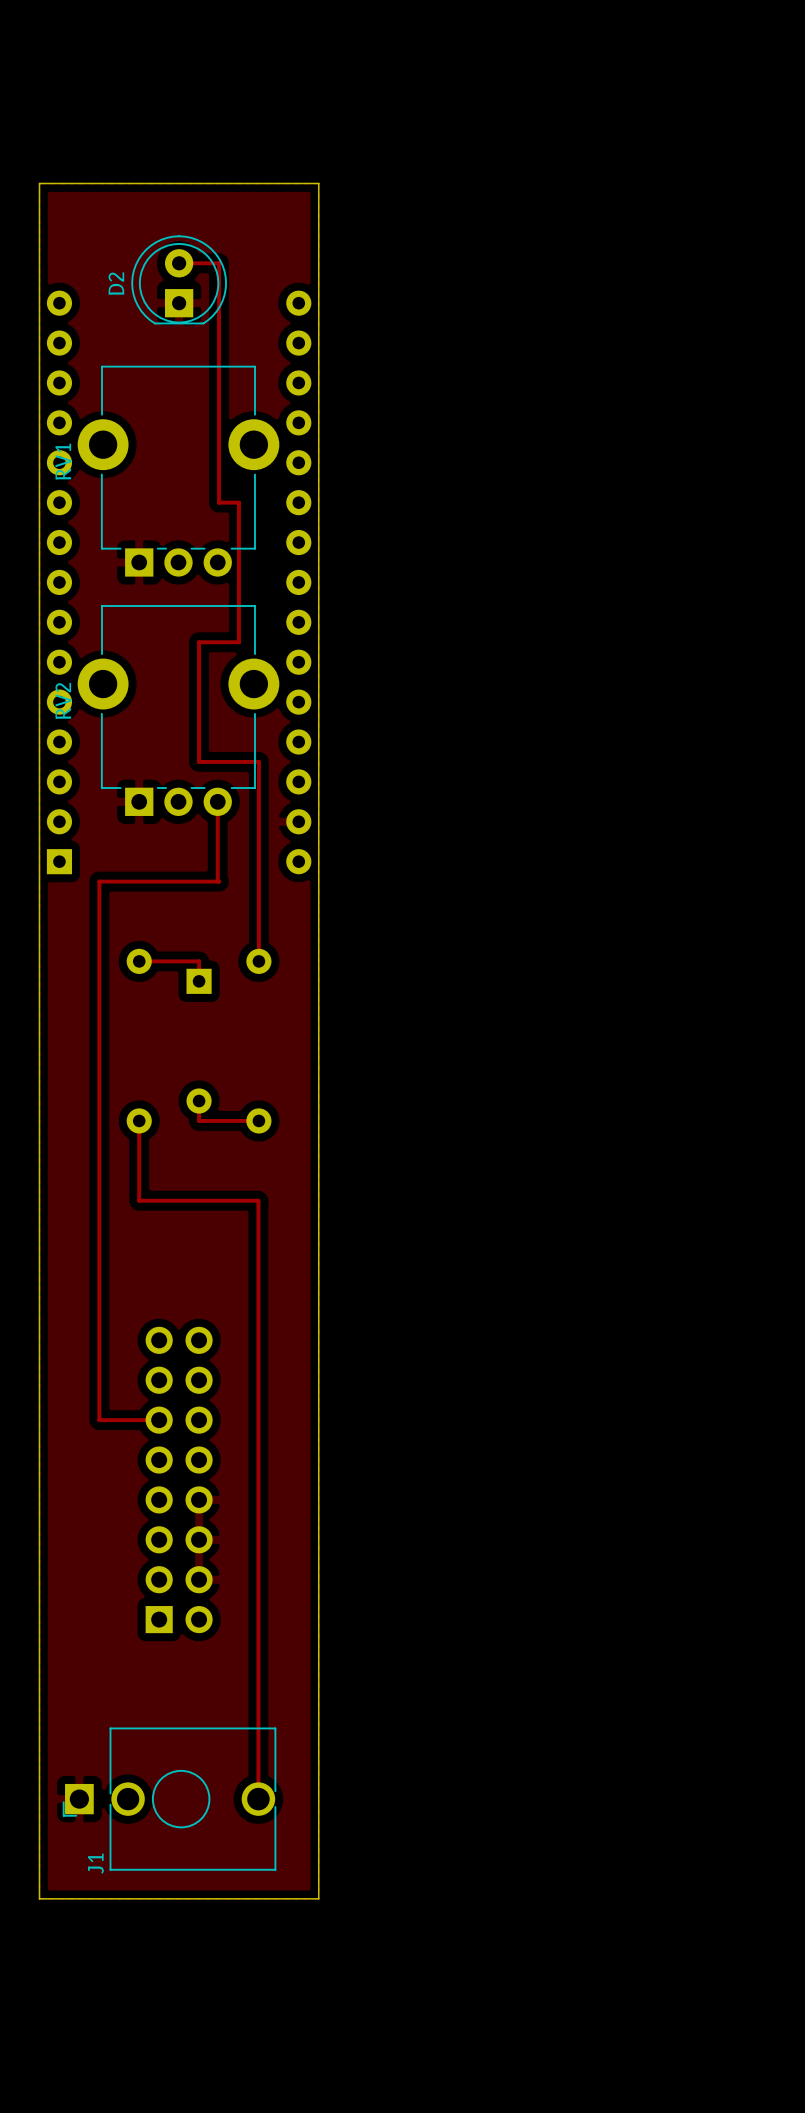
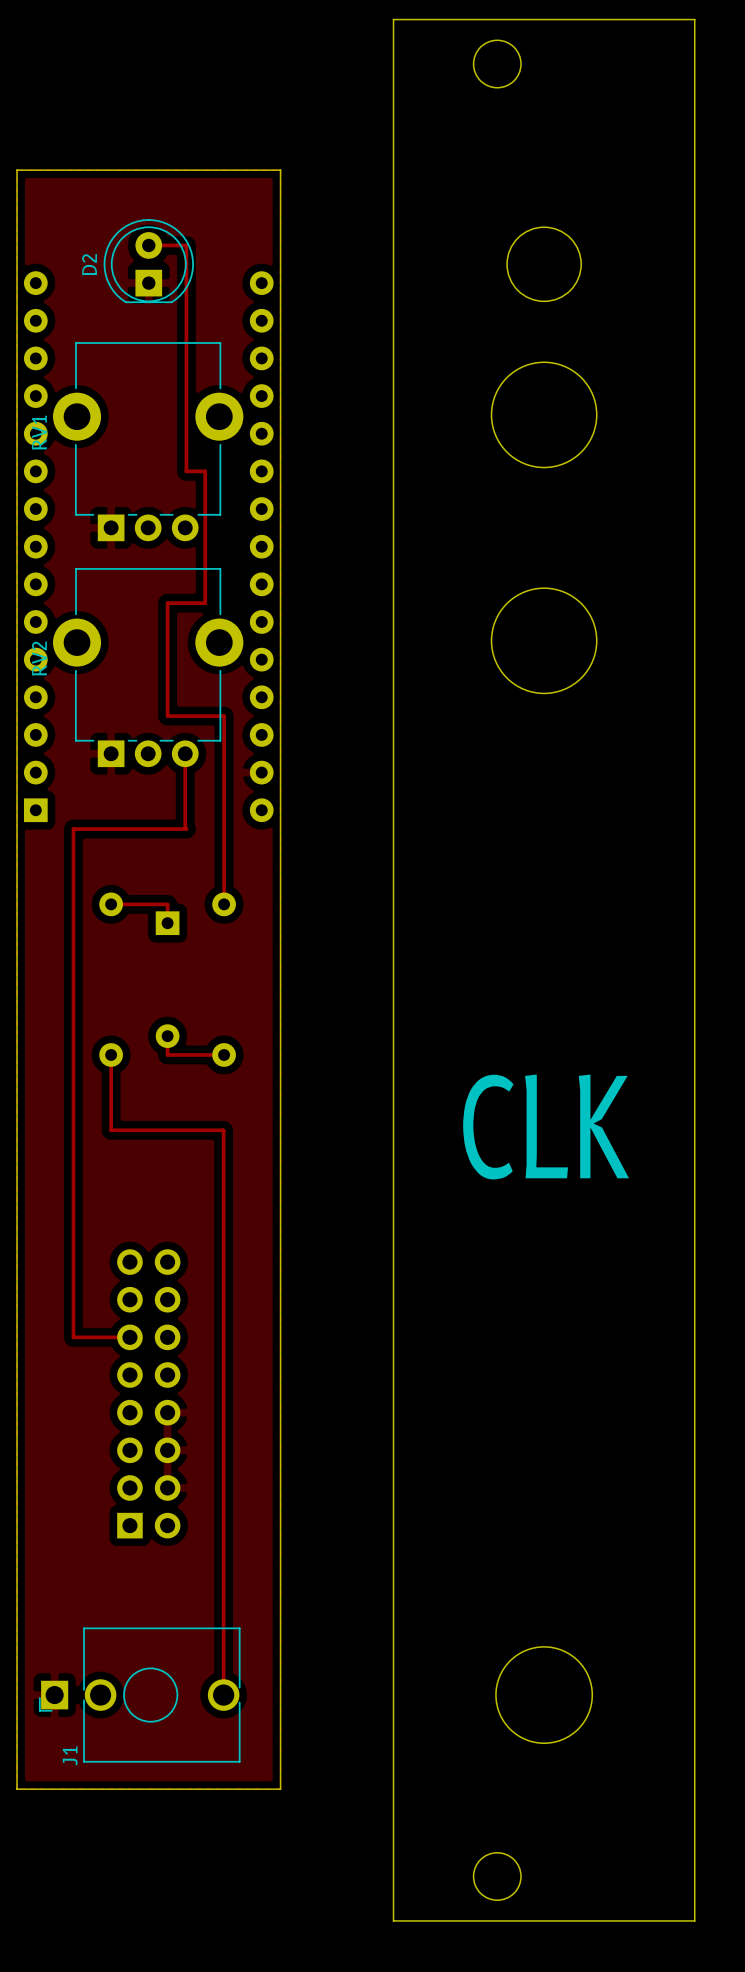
board edge: none -> (393, 19) (694, 19) (694, 1920) (393, 1920) (393, 19)
round board edge: none -> [473, 39, 522, 89]
round board edge: none -> [506, 226, 582, 302]
round board edge: none -> [491, 361, 598, 468]
round board edge: none -> [491, 587, 598, 694]
text: none -> CLK (546, 1126)
round board edge: none -> [495, 1646, 593, 1744]
round board edge: none -> [473, 1852, 522, 1901]

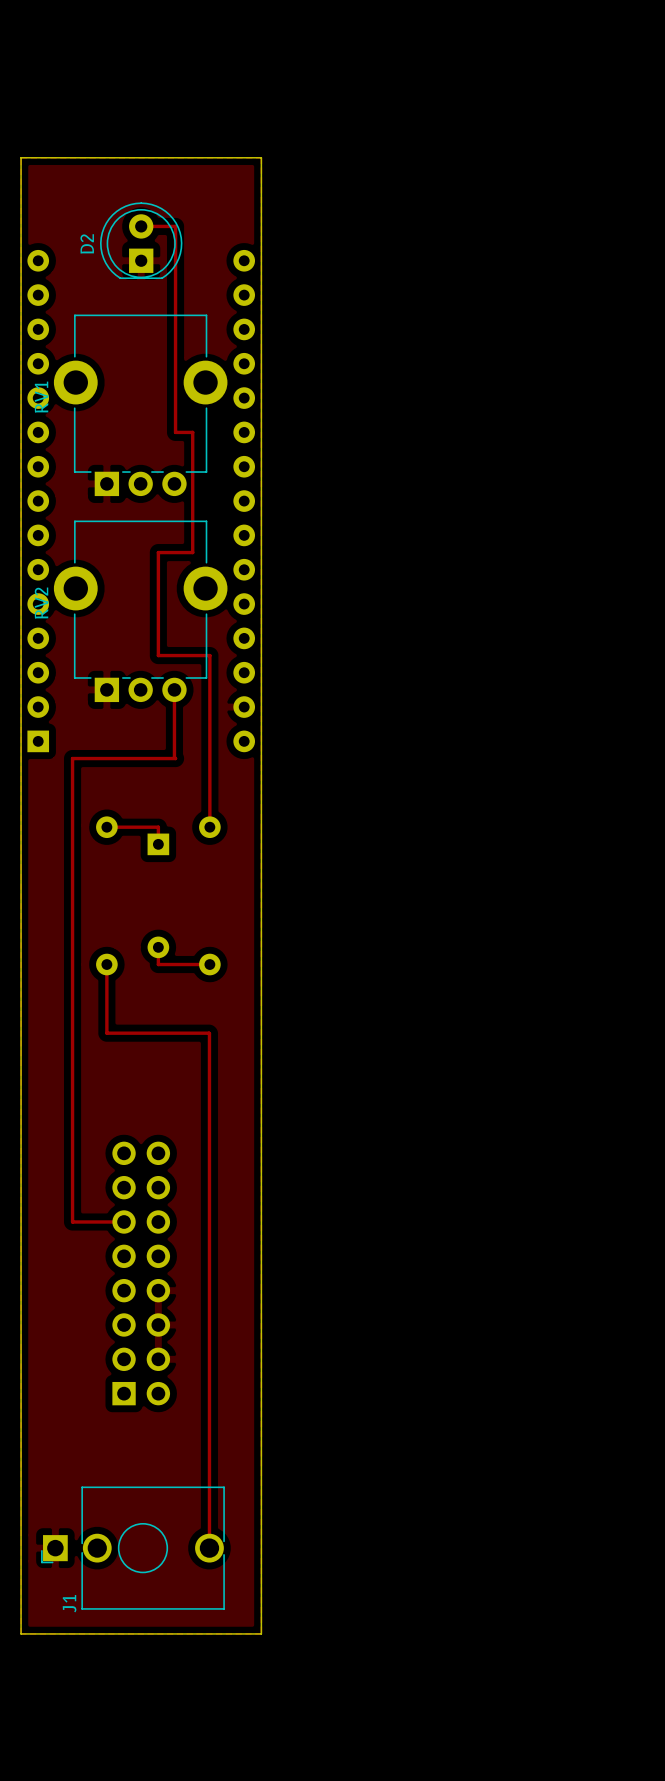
board edge: (393, 19) (694, 19) (694, 1920) (393, 1920) (393, 19) -> none
round board edge: [473, 39, 522, 89] -> none
round board edge: [506, 226, 582, 302] -> none
round board edge: [491, 361, 598, 468] -> none
round board edge: [491, 587, 598, 694] -> none
text: CLK (546, 1126) -> none
round board edge: [495, 1646, 593, 1744] -> none
round board edge: [473, 1852, 522, 1901] -> none

